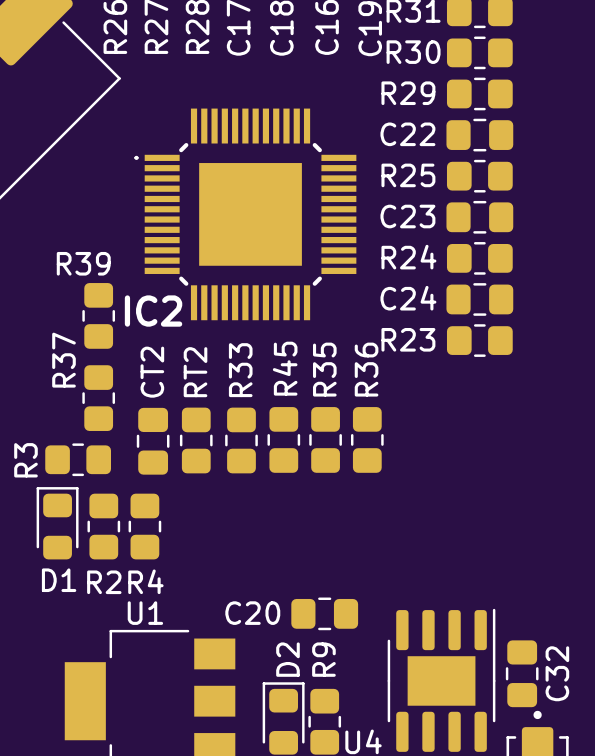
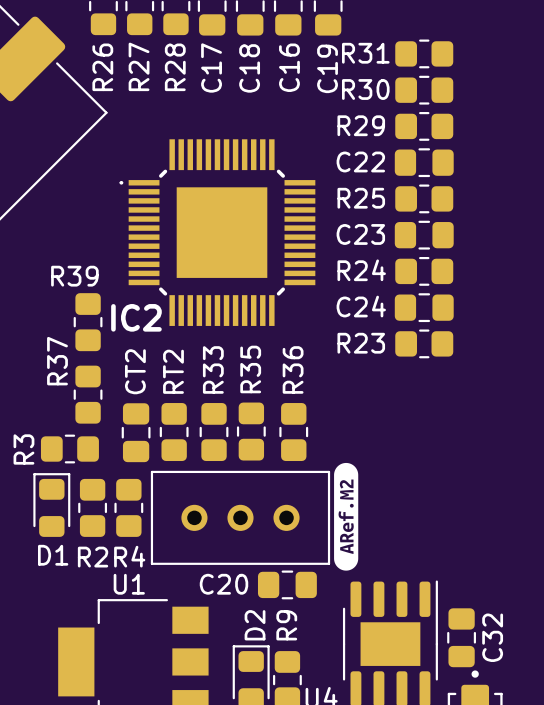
R45 name: R45 (285, 368) -> R35 (250, 369)
R35: (325, 439) -> none
R36 position: (367, 439) -> (293, 432)
drawing: none -> [334, 462, 359, 571]
part: none -> (240, 517)

